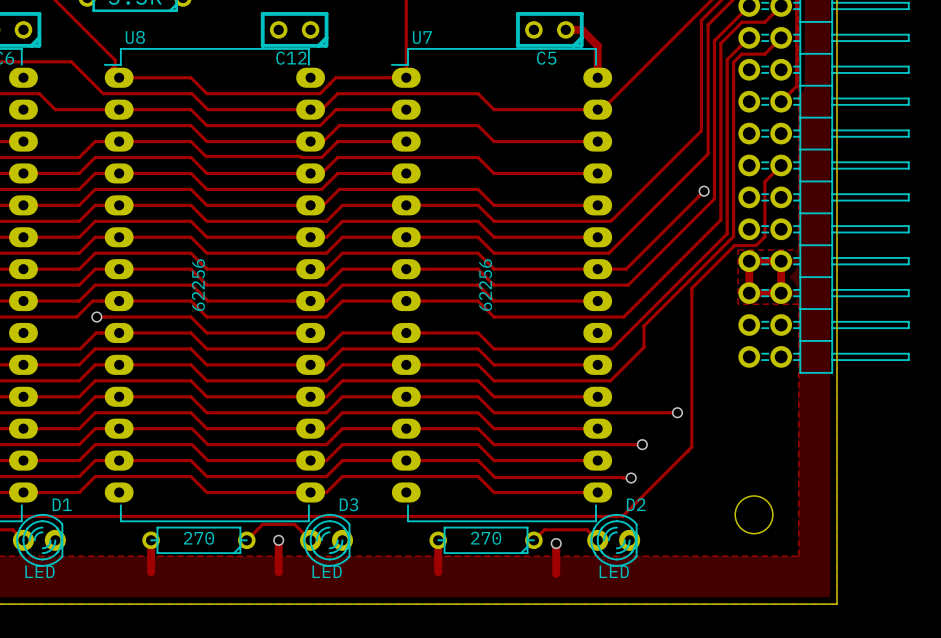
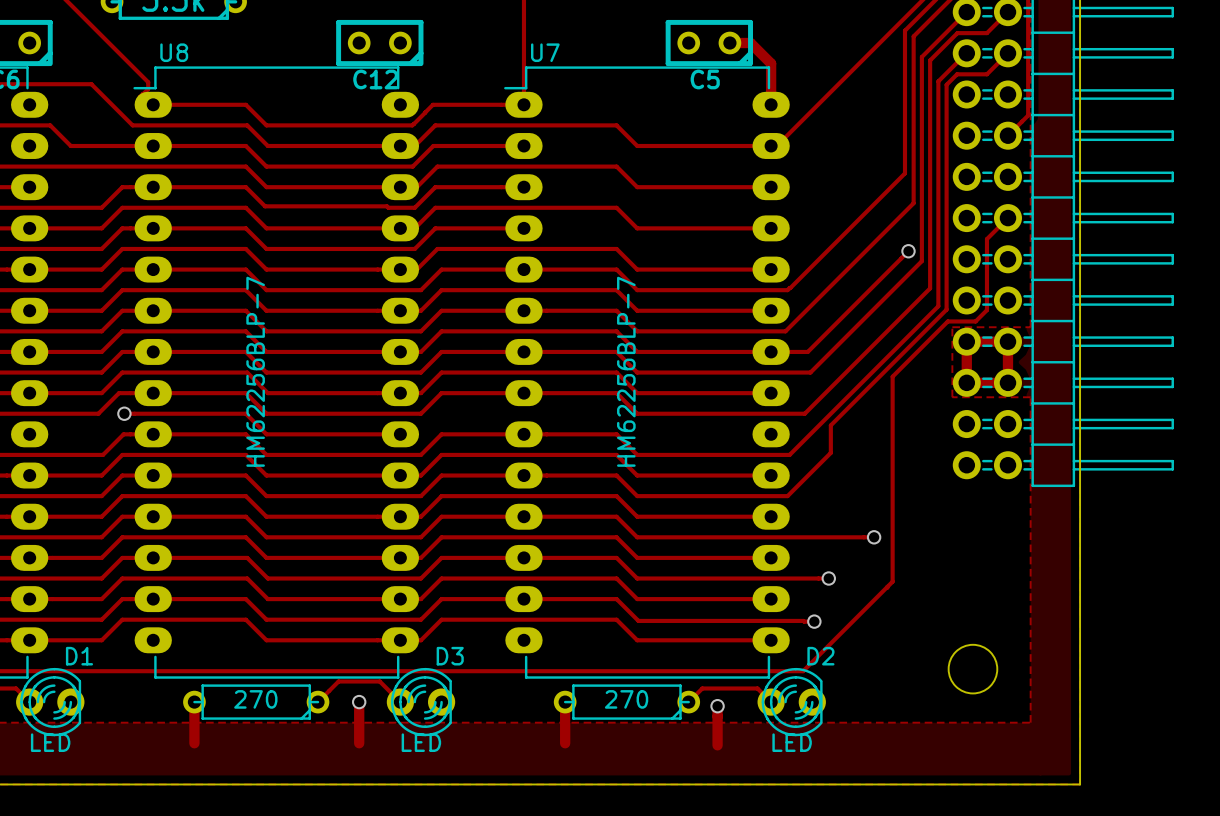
U8 value: 62256 (198, 285) -> HM62256BLP-7 (255, 371)
U7 value: 62256 (485, 285) -> HM62256BLP-7 (626, 371)

